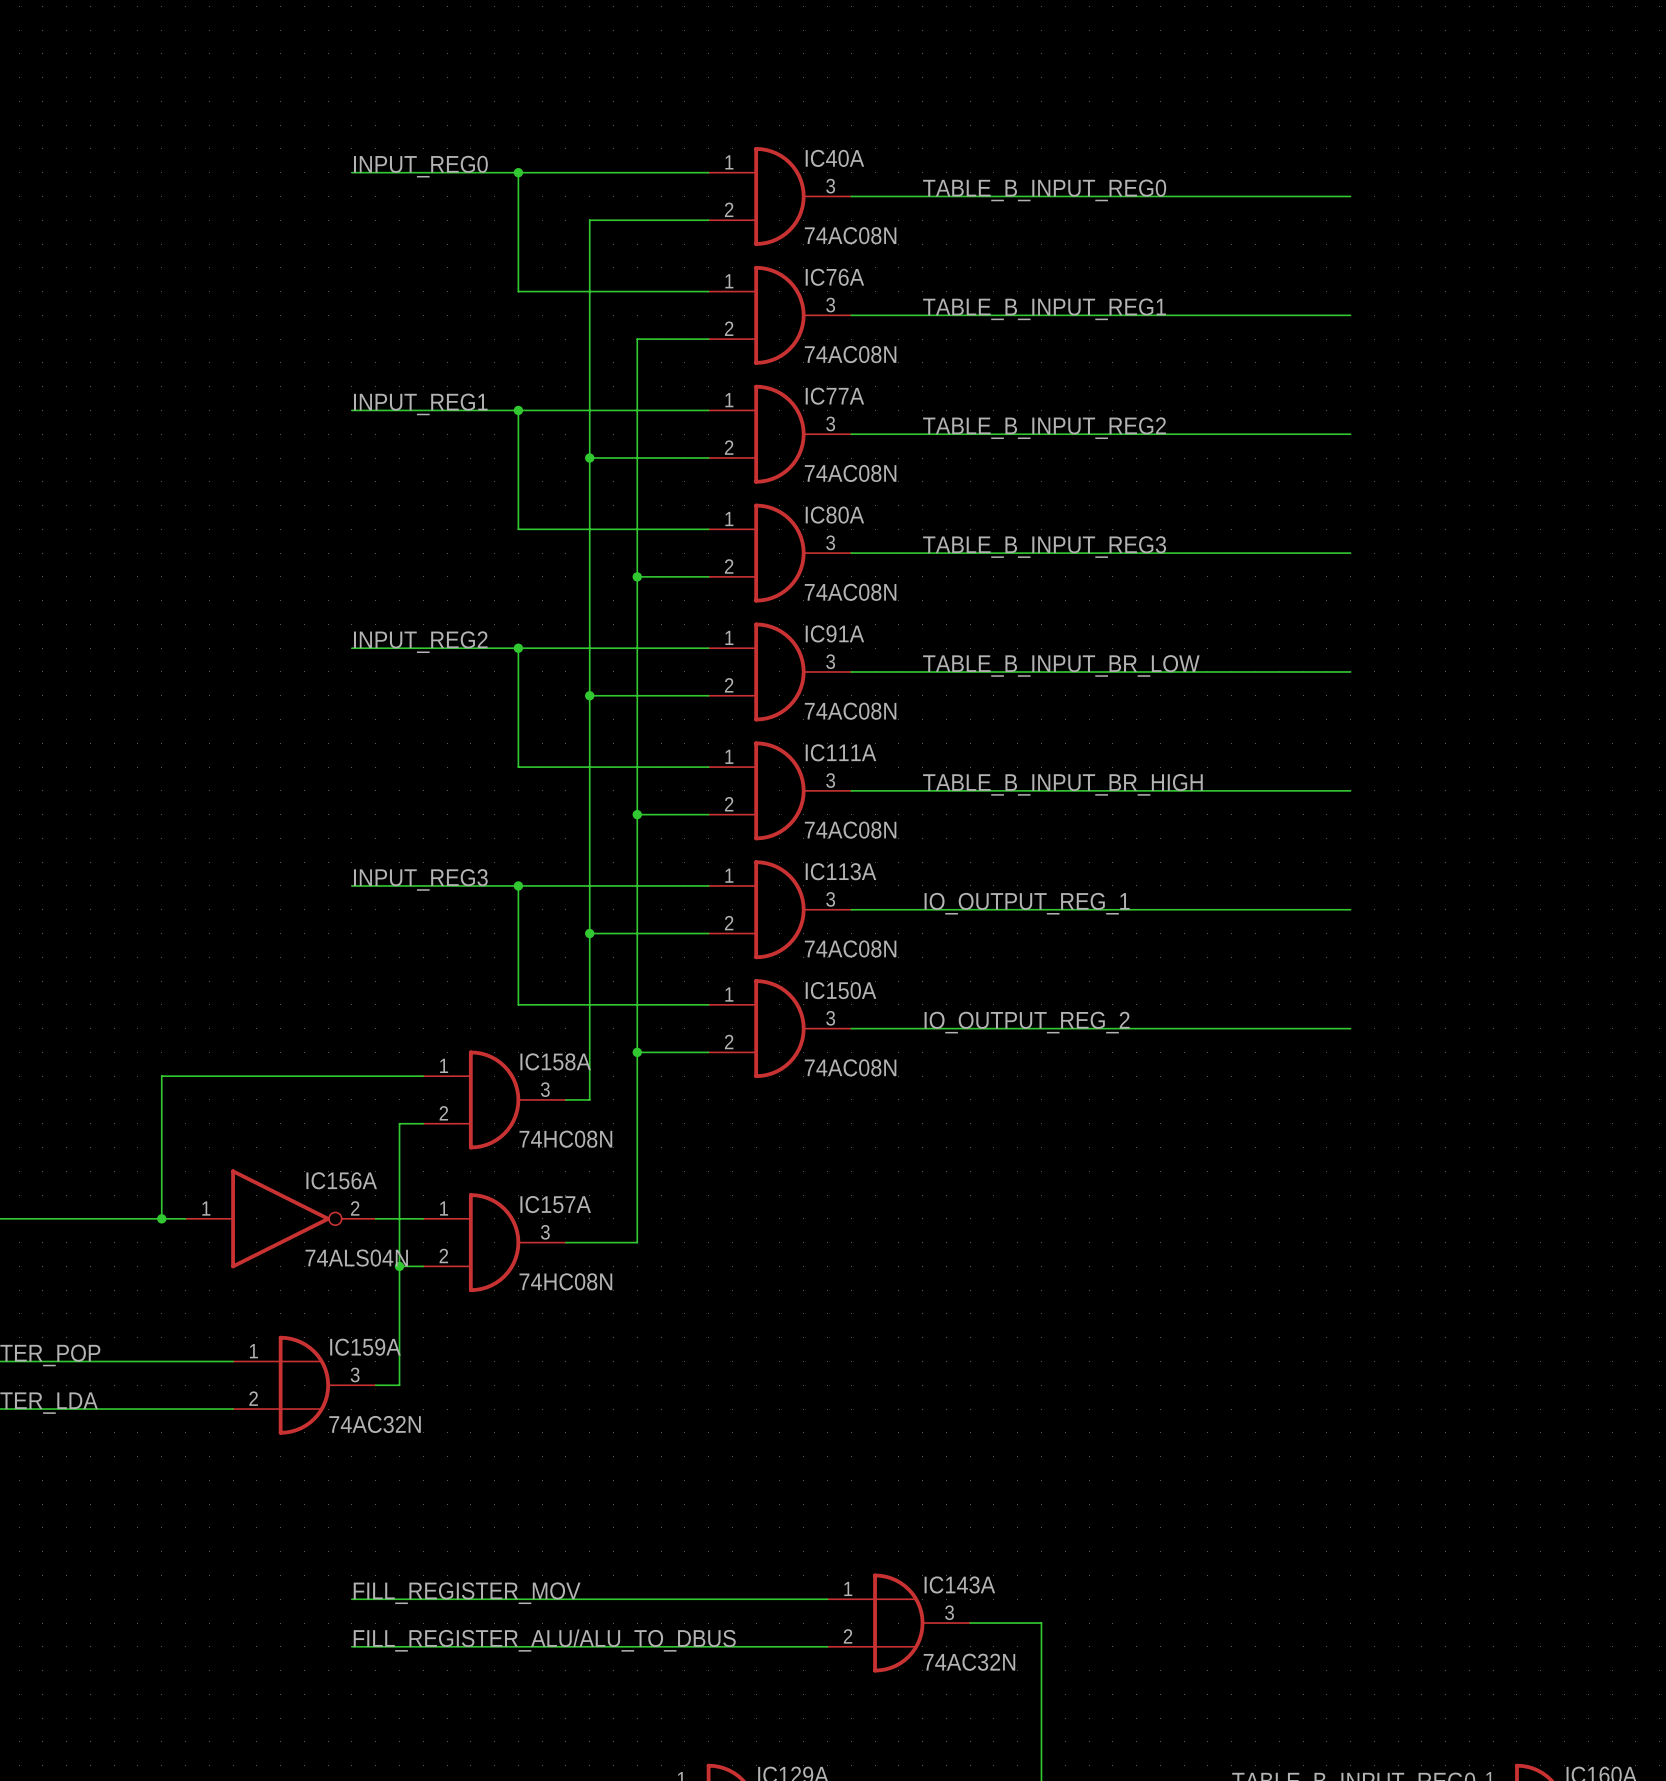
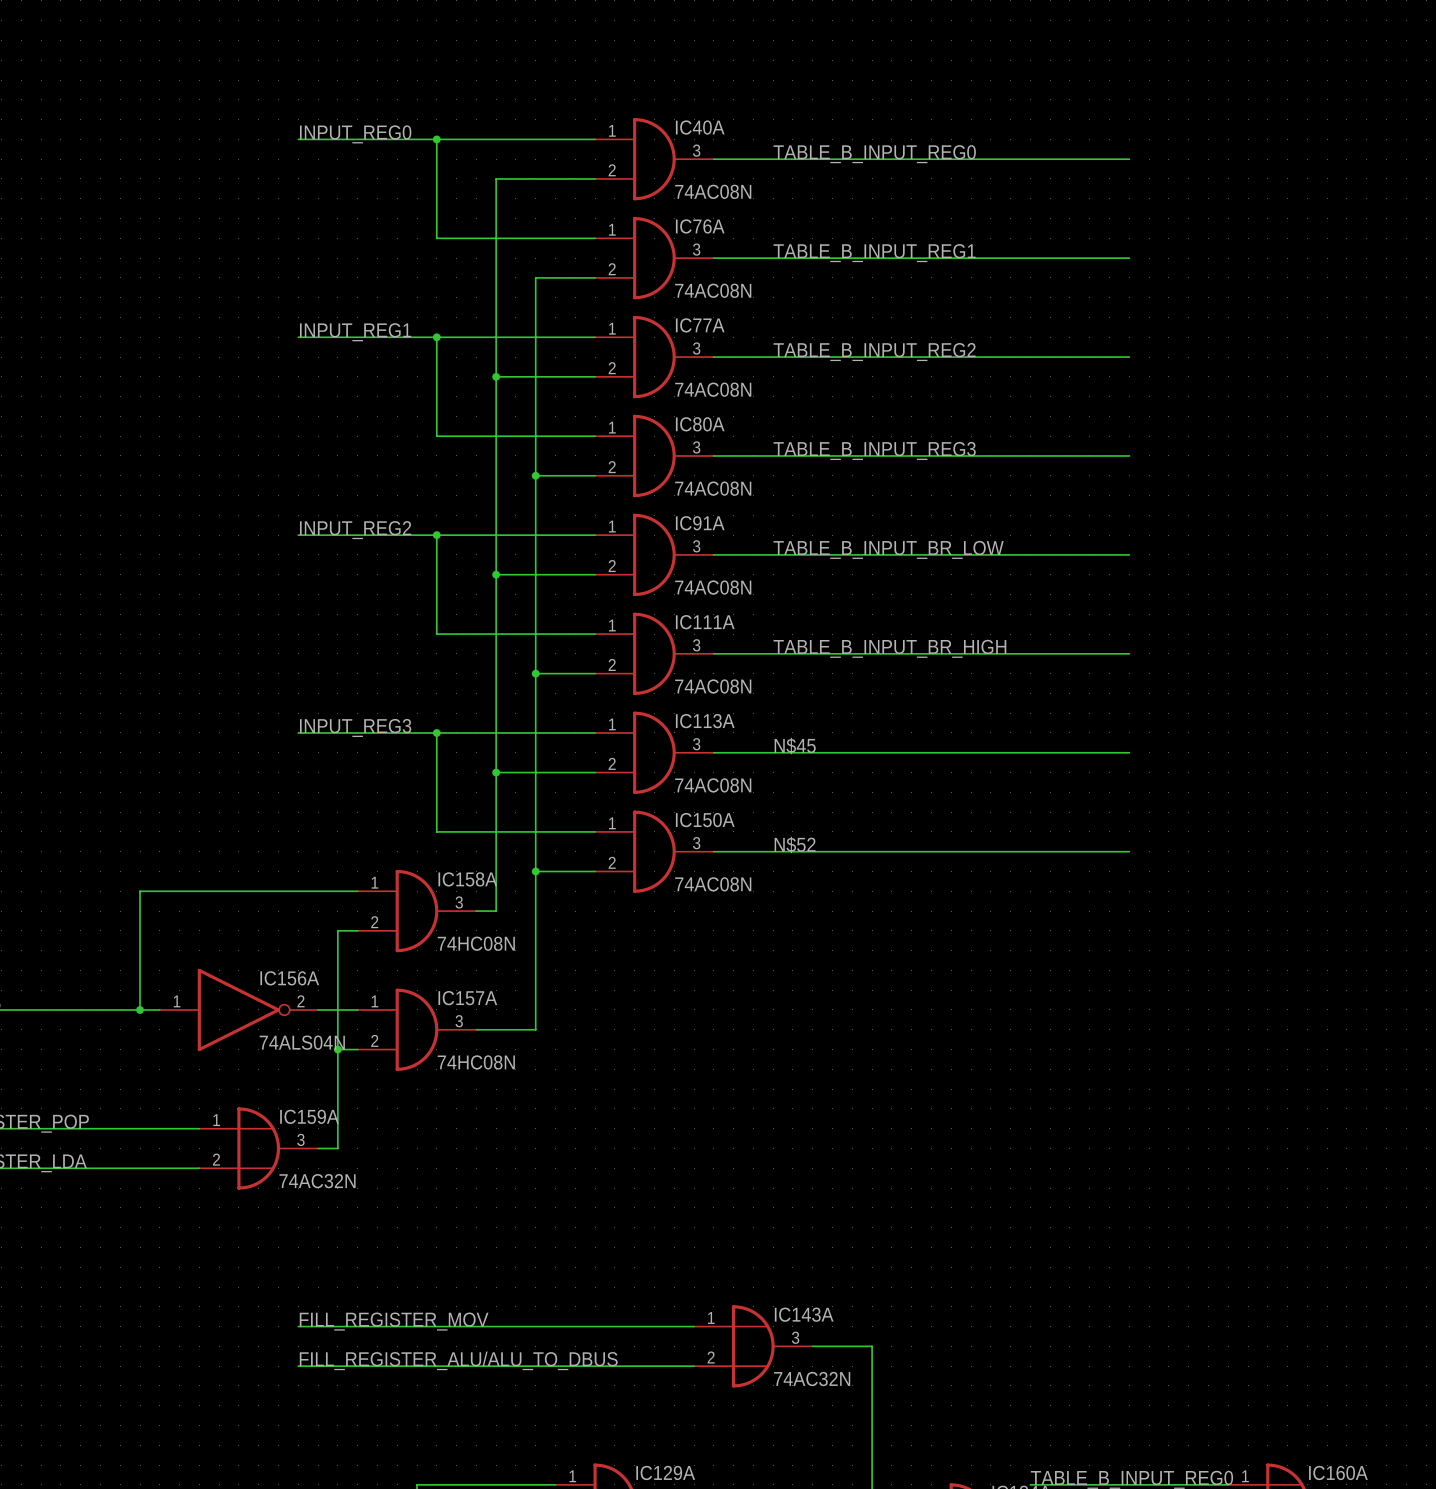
label: IO_OUTPUT_REG_1 (1027, 903) -> N$45 (795, 746)
label: IO_OUTPUT_REG_2 (1027, 1022) -> N$52 (795, 844)

